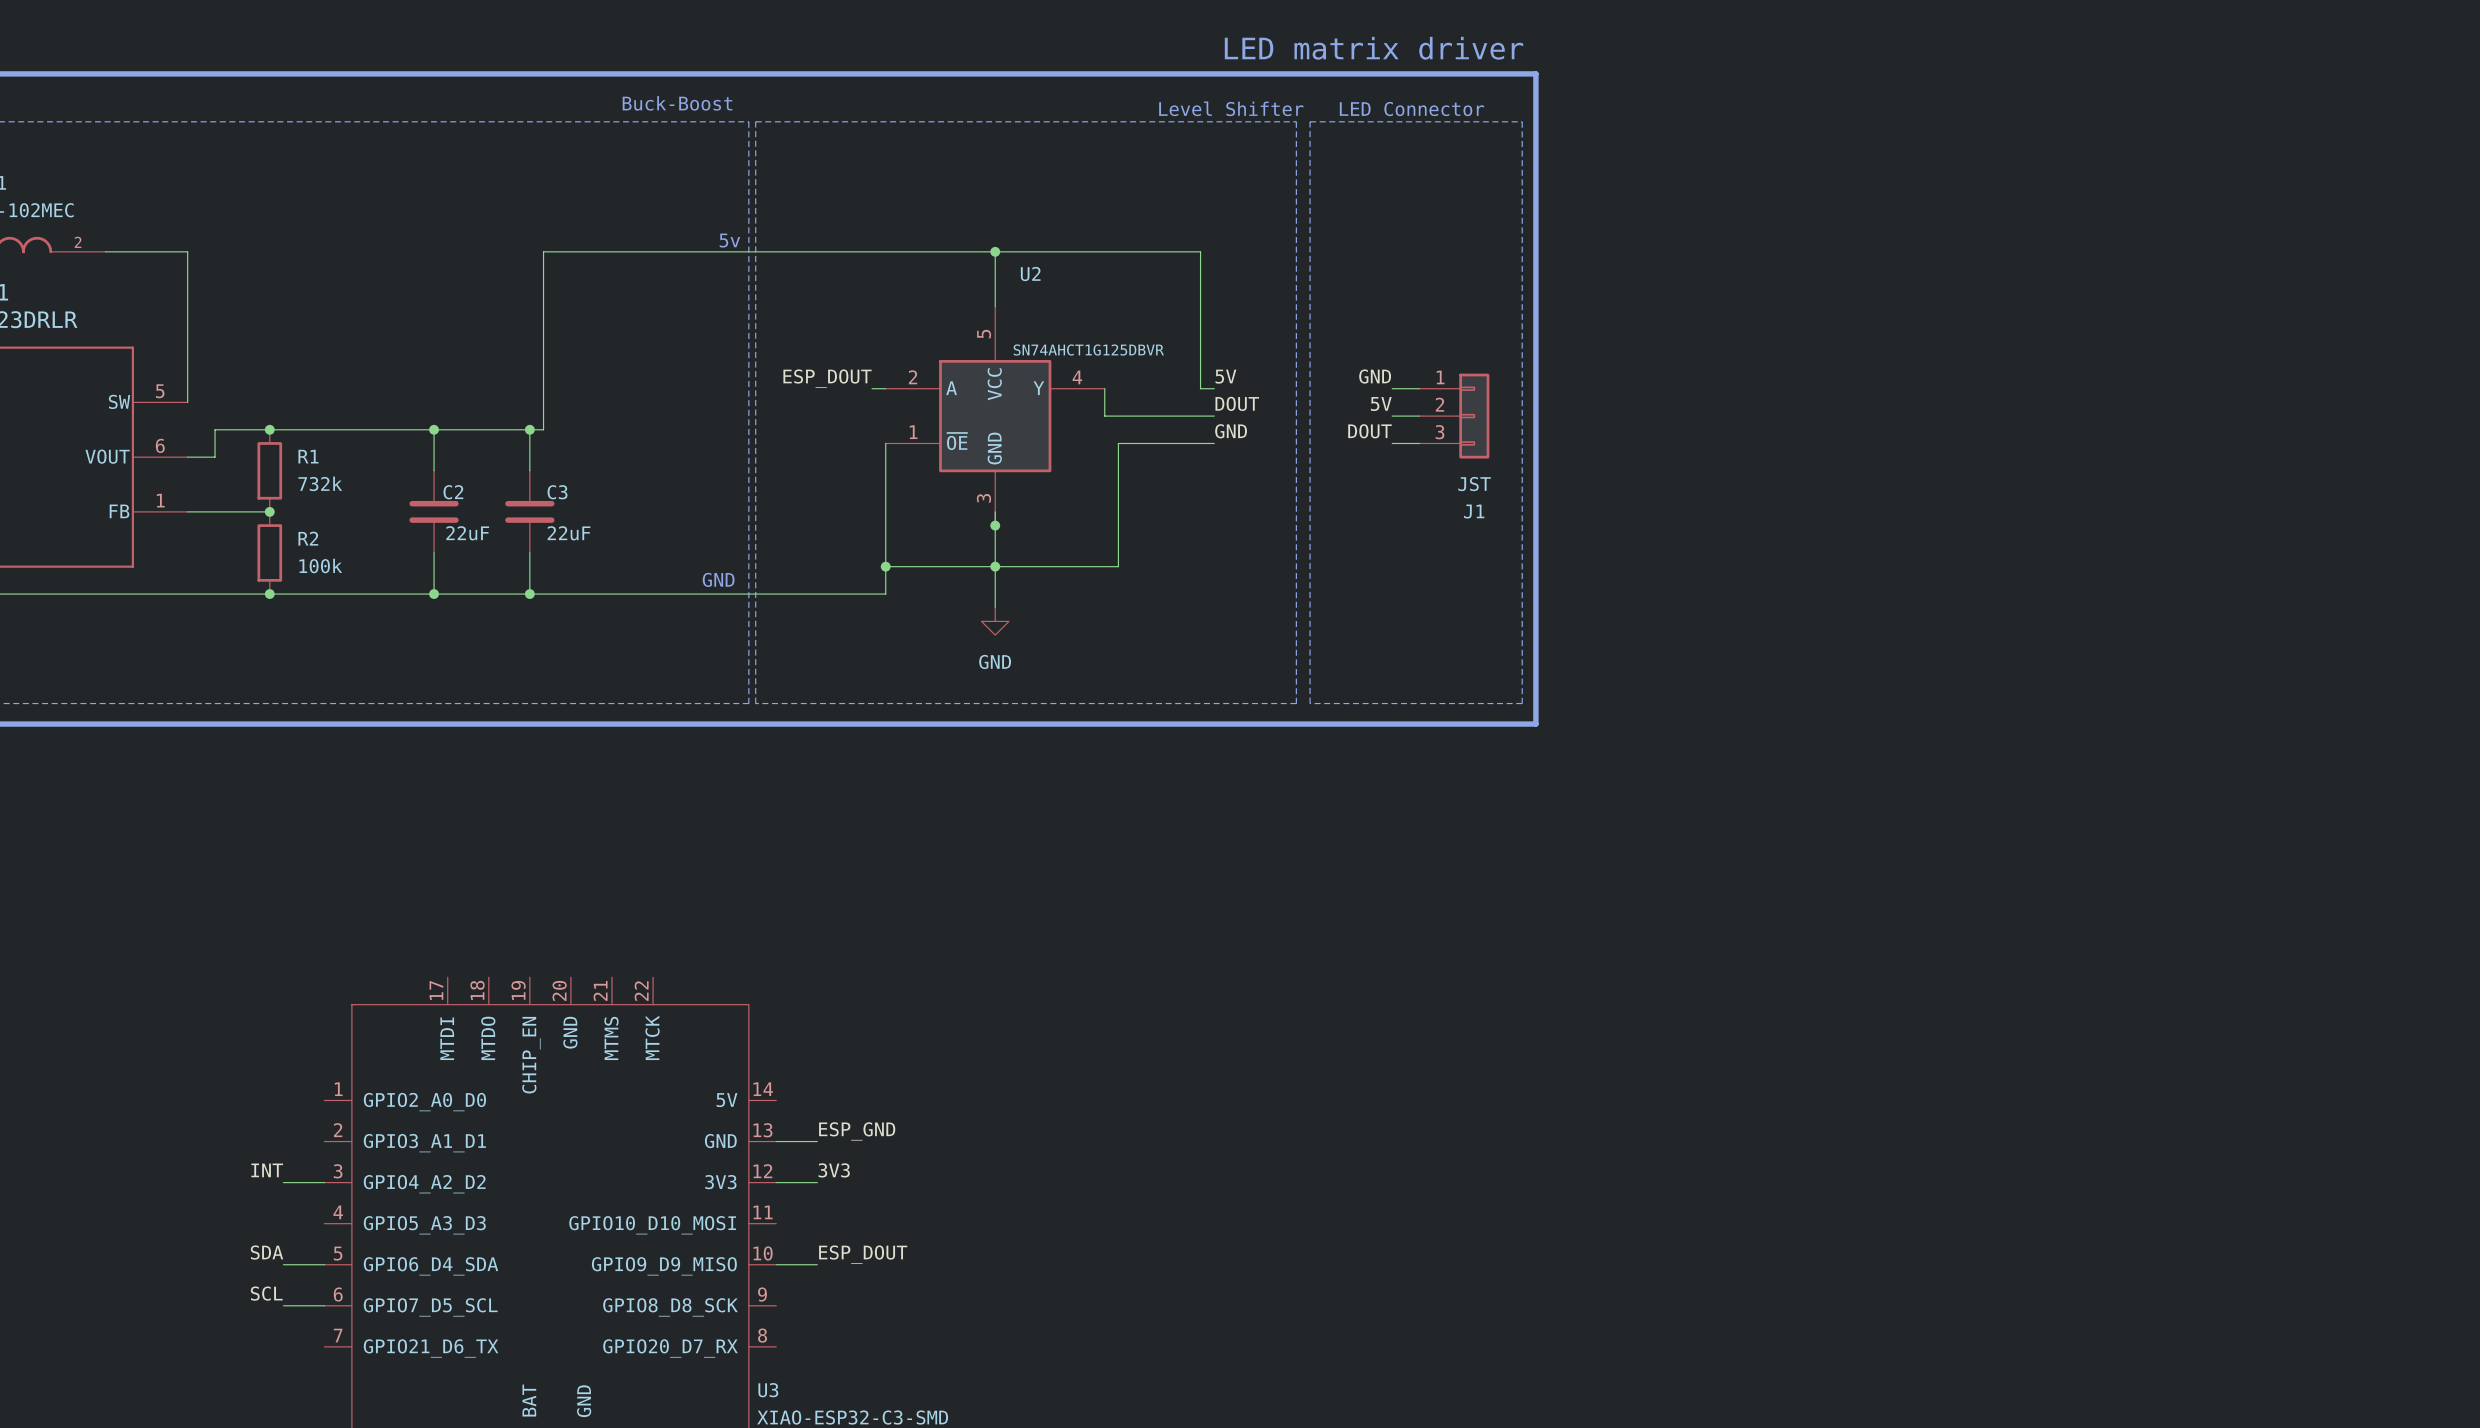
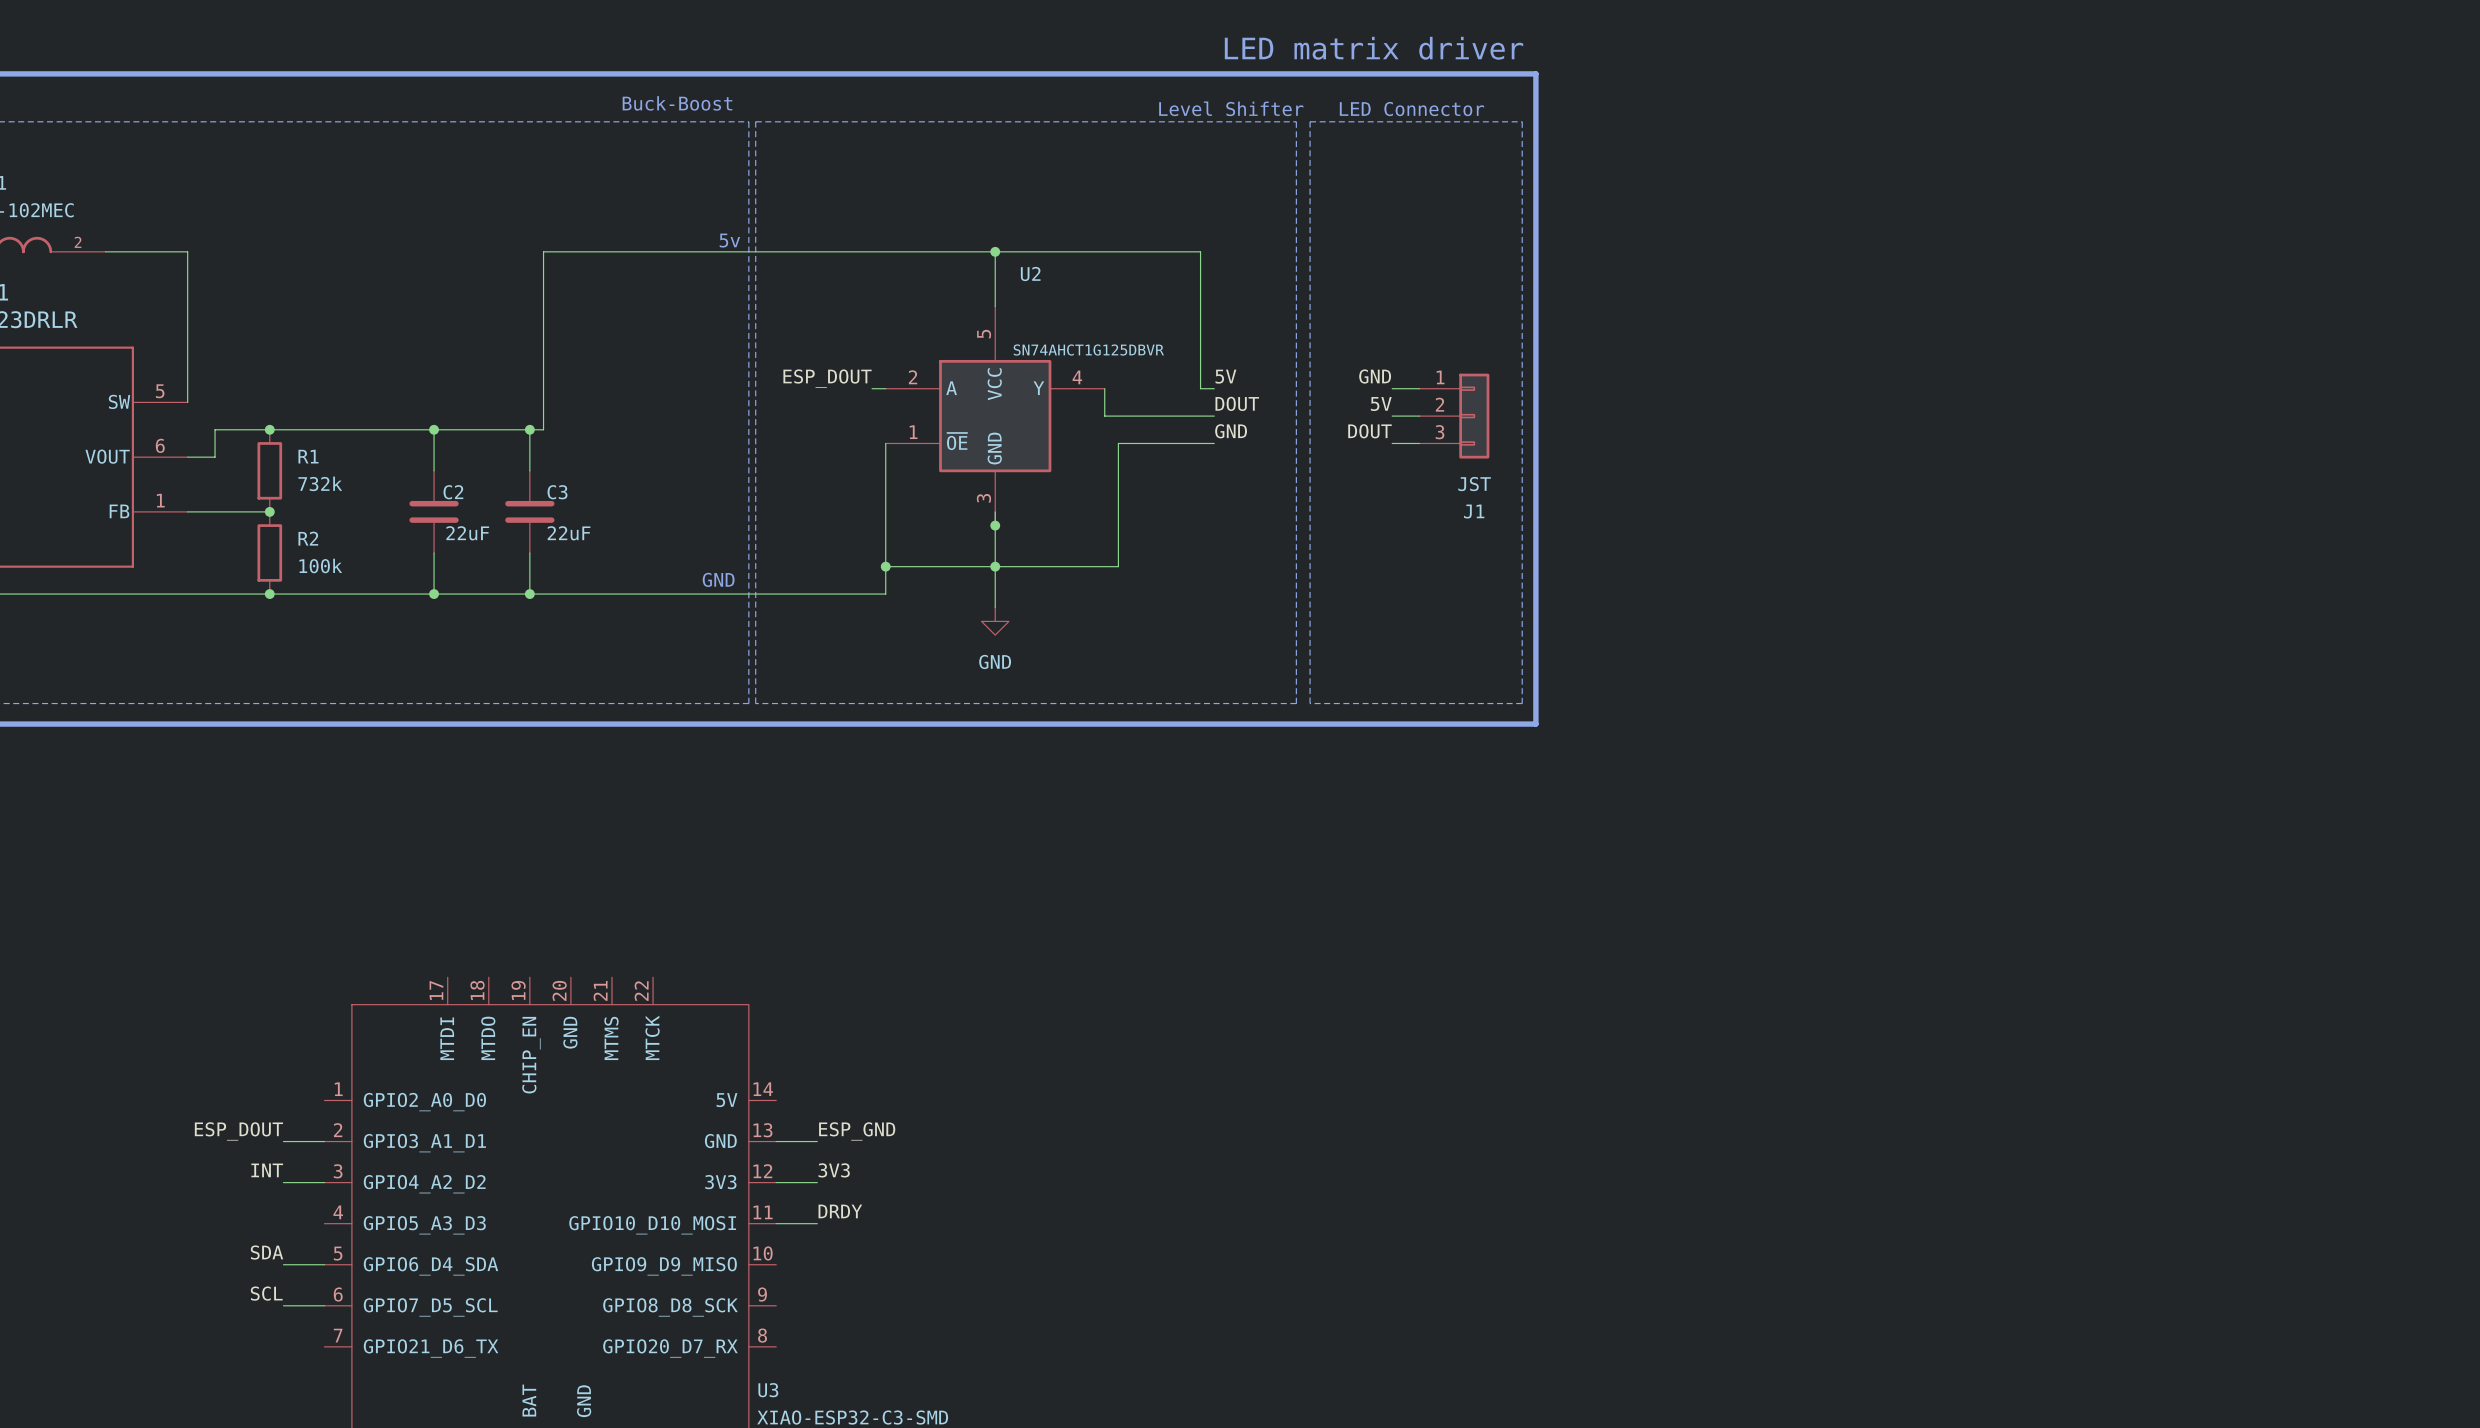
label: none -> ESP_DOUT (238, 1131)
wire: none -> (283, 1141) (324, 1141)
label: none -> DRDY (840, 1211)
label: ESP_DOUT (863, 1254) -> none
wire: (776, 1264) (817, 1264) -> (776, 1223) (817, 1223)

